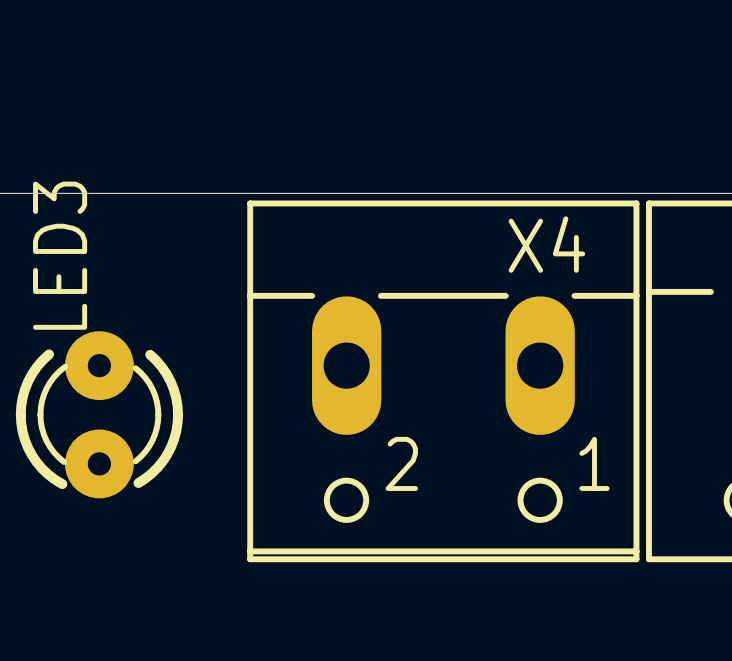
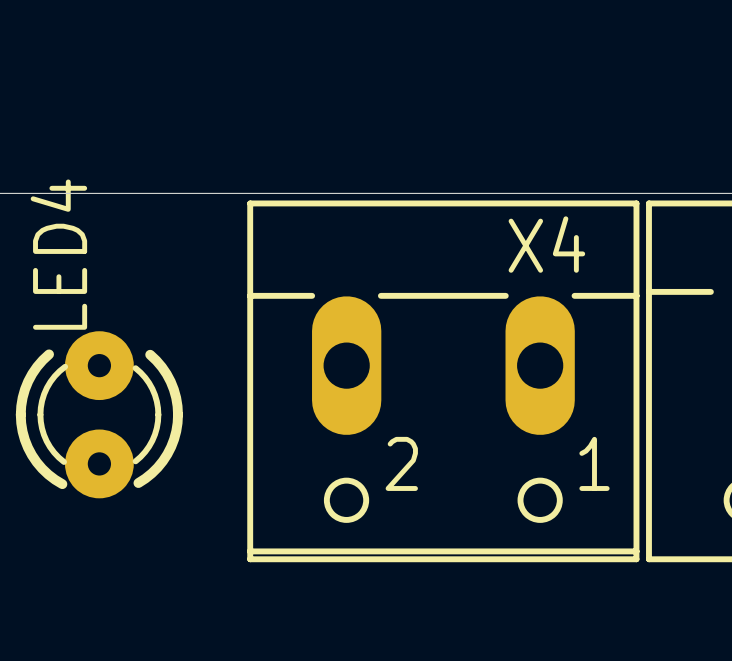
LED3 name: LED3 (60, 255) -> LED4 (58, 254)

